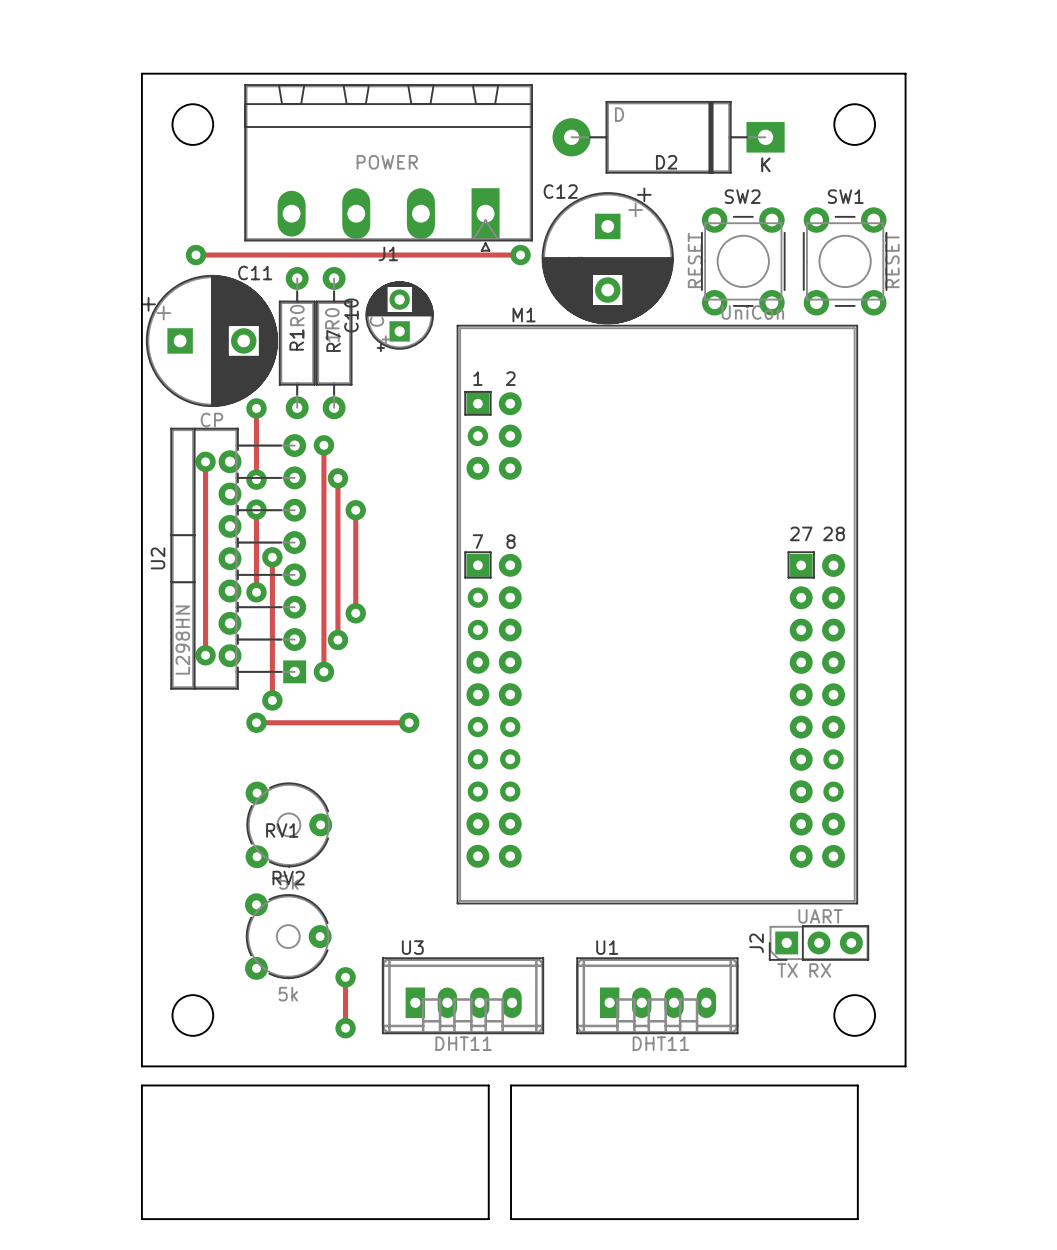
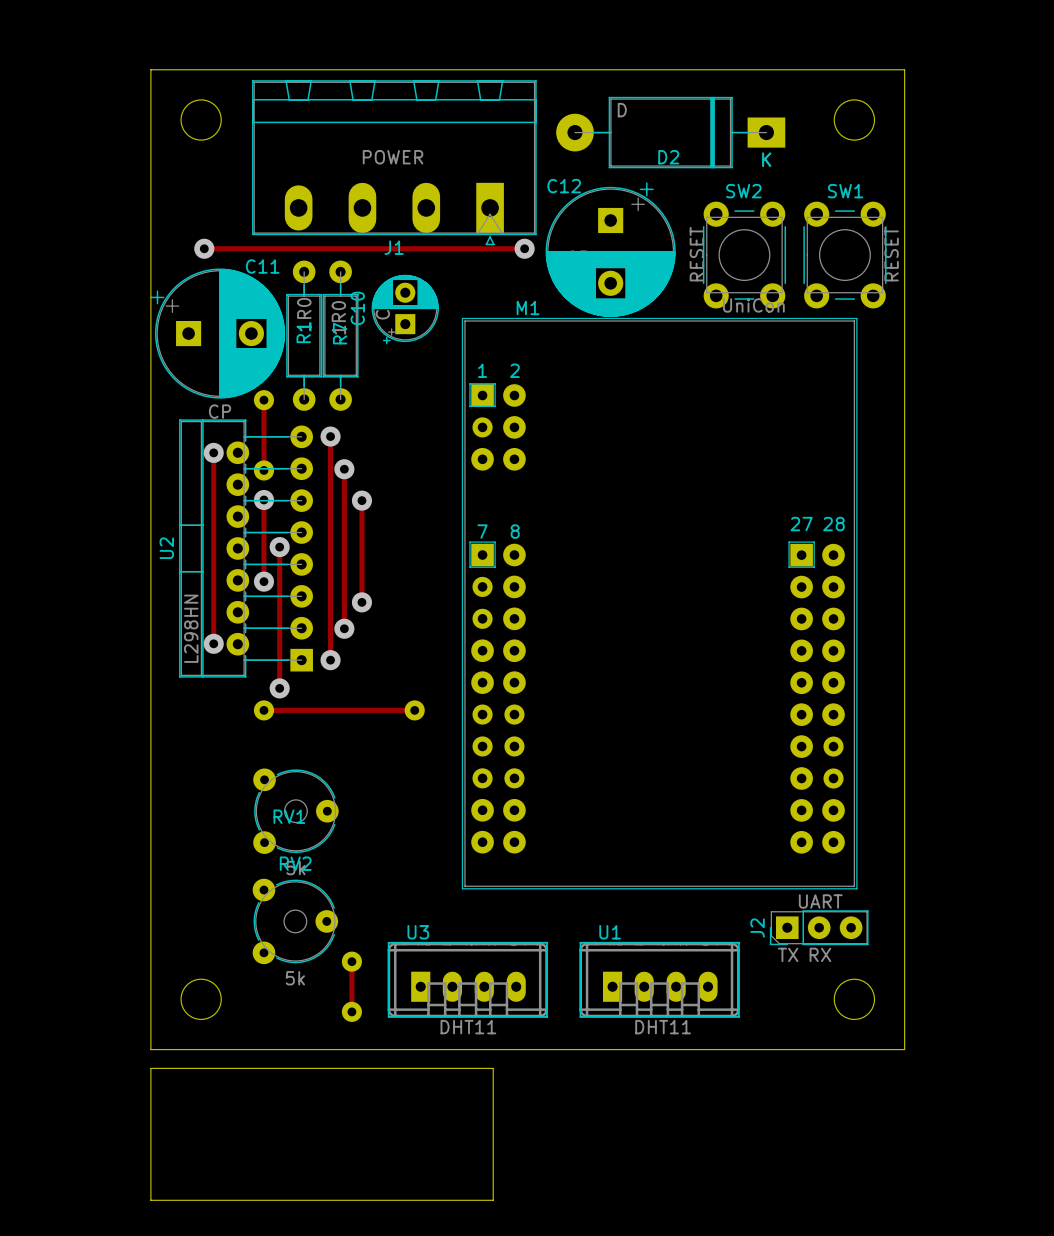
board edge: (511, 1085) (857, 1085) (857, 1219) (511, 1219) (511, 1085) -> none

